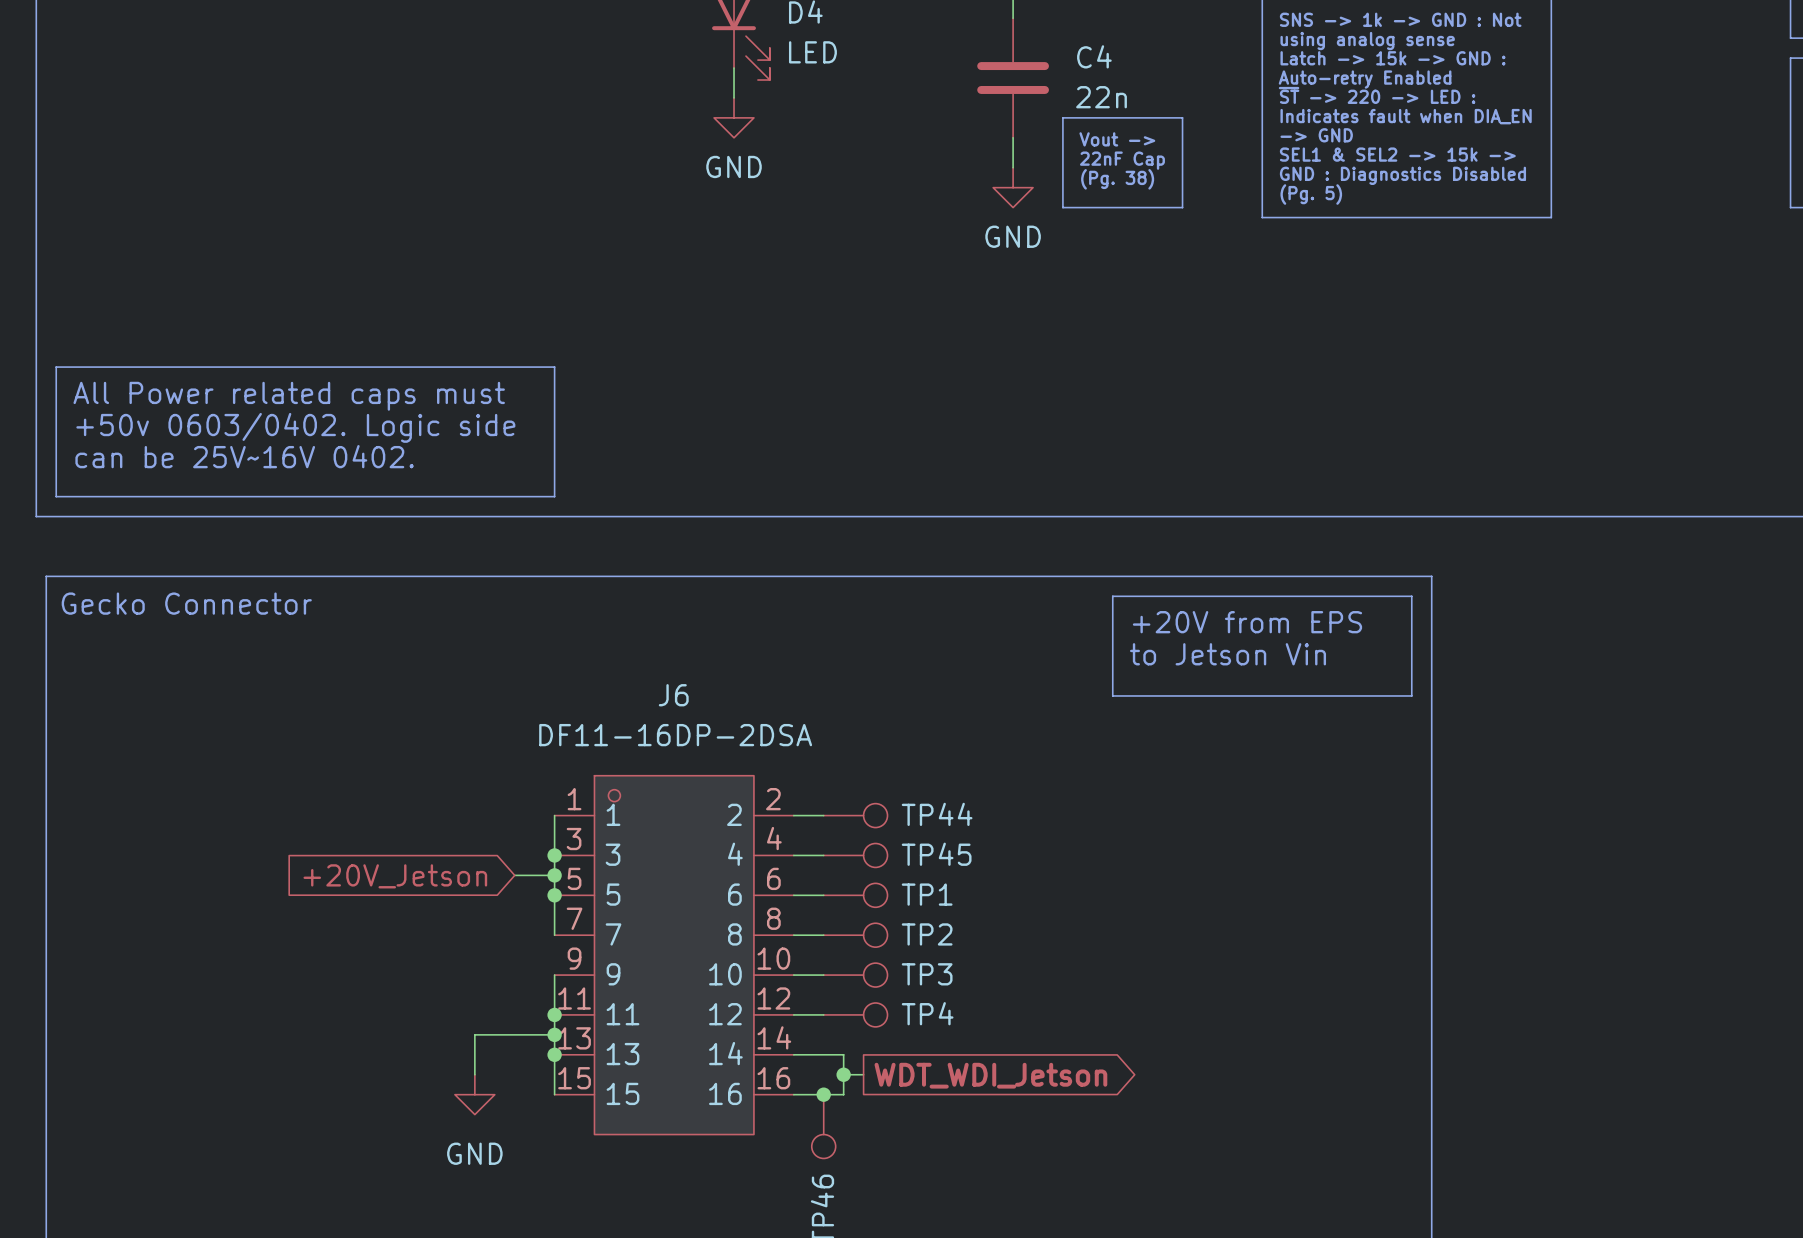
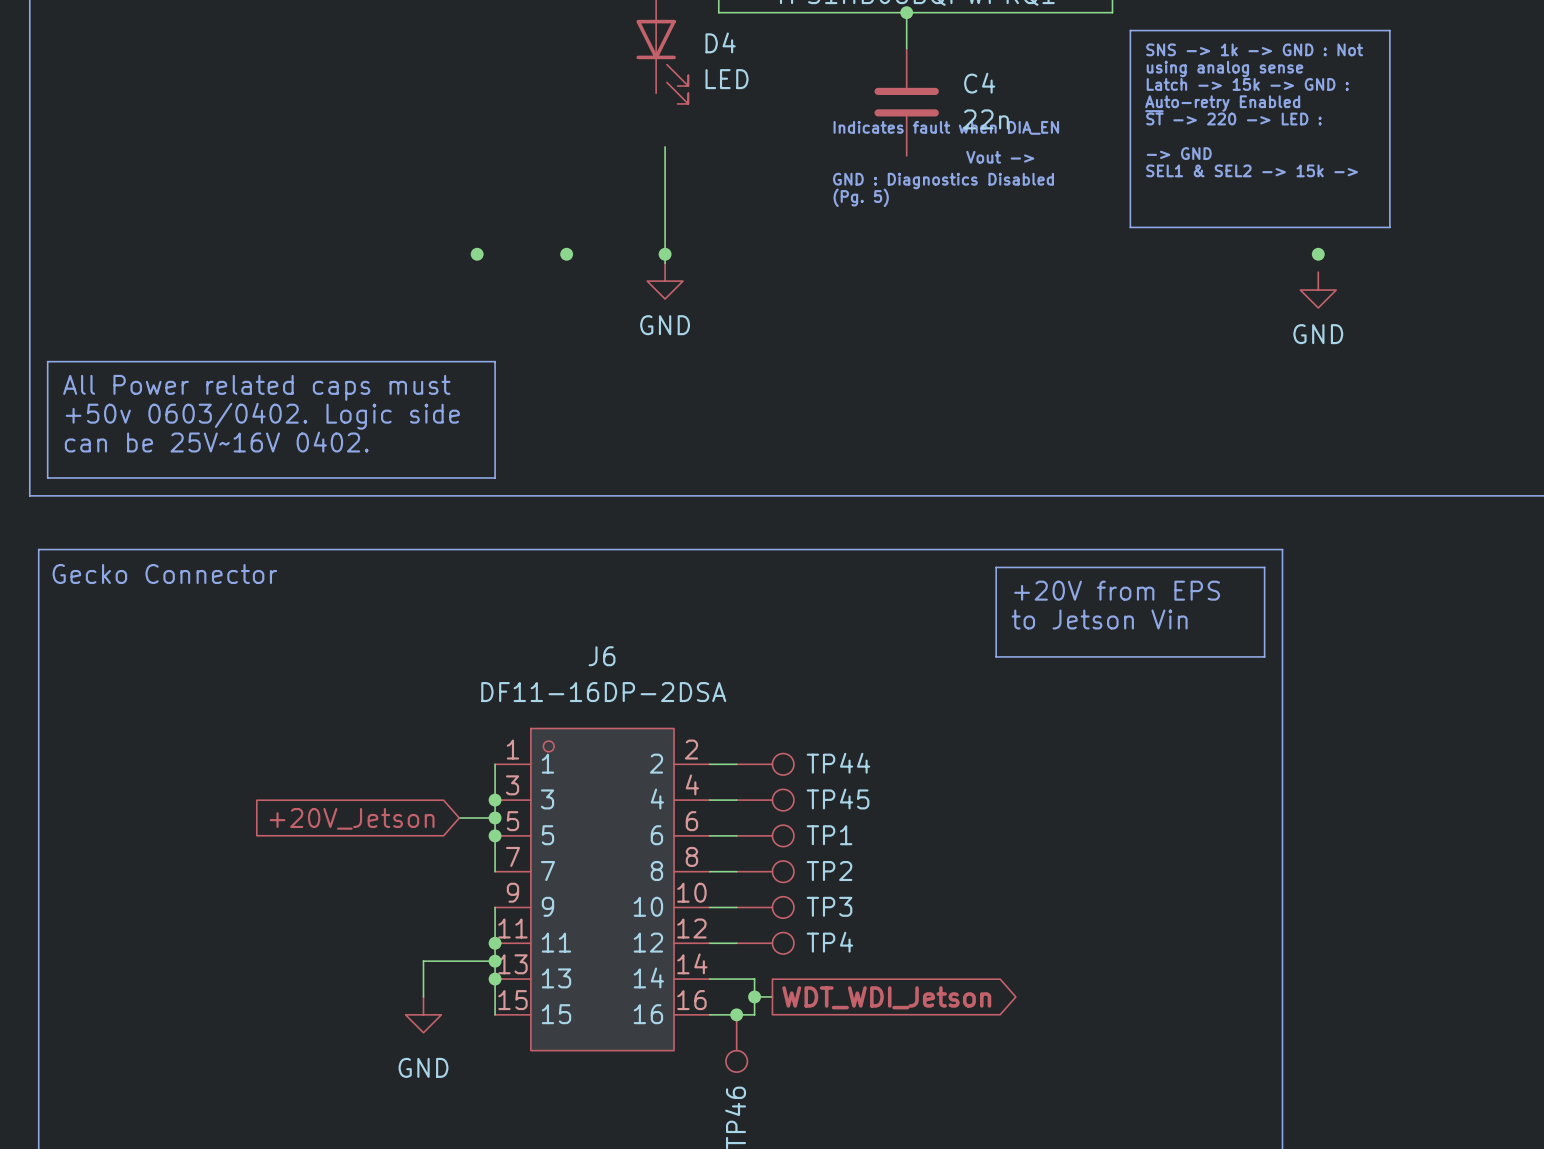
wire: (734, 68) (734, 97) -> none
text position: Indicates fault when DIA_EN (1406, 116) -> Indicates fault when DIA_EN (946, 127)
power symbol: GND (734, 117) -> none
line: (1062, 117) (1182, 117) (1182, 207) (1062, 207) (1062, 117) -> none
wire: none -> (665, 146) (665, 263)
wire: (1013, 137) (1013, 167) -> none
text: 22nF Cap (1122, 160) -> none
text position: GND : Diagnostics Disabled (1402, 175) -> GND : Diagnostics Disabled (943, 181)
text: (Pg. 38) (1117, 179) -> none
power symbol: GND (1013, 187) -> none
text position: (Pg. 5) (1311, 194) -> (Pg. 5) (861, 197)
junction: none -> (477, 254)
junction: none -> (566, 254)
junction: none -> (665, 254)
junction: none -> (1318, 254)
power symbol: none -> GND (665, 281)
power symbol: none -> GND (1318, 290)

